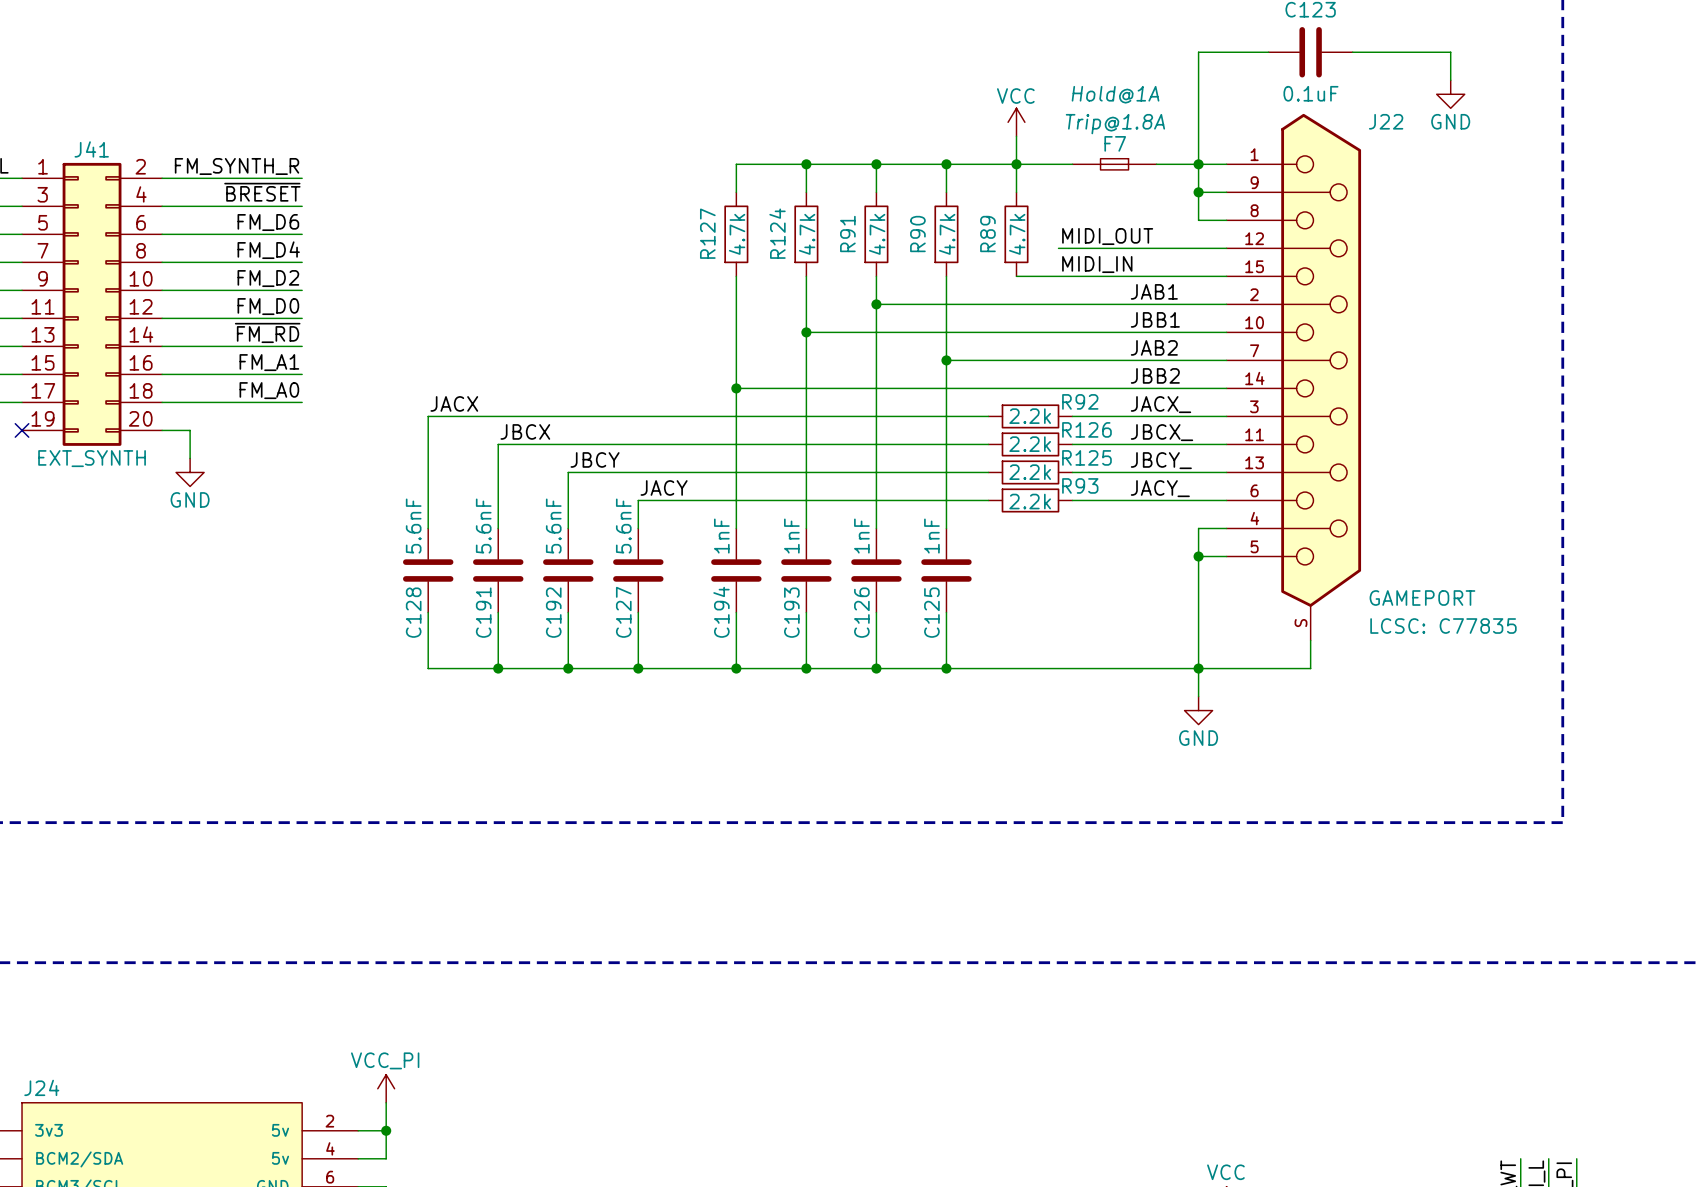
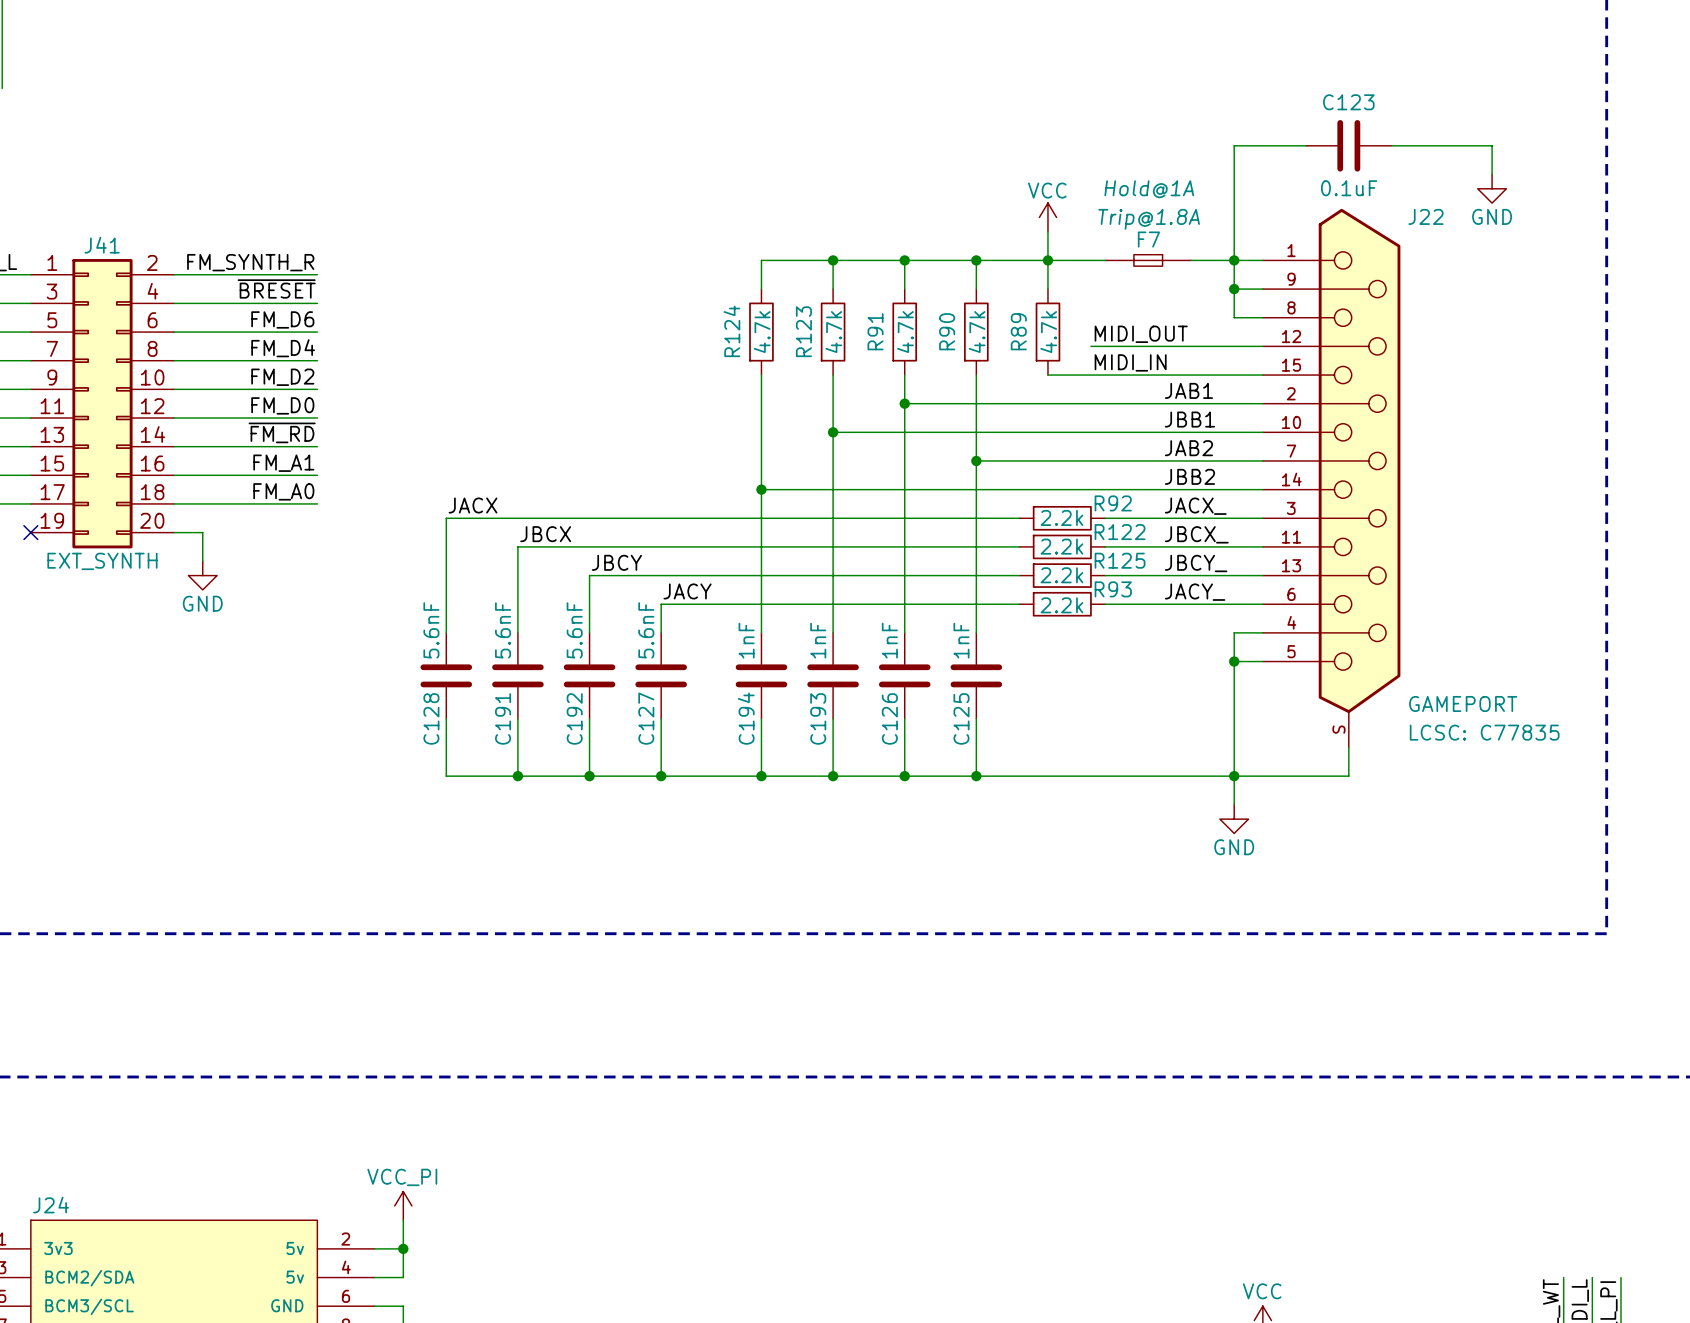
R127 name: R127 (707, 233) -> R124 (731, 331)
R124 name: R124 (777, 233) -> R123 (803, 331)
R126 name: R126 (1086, 429) -> R122 (1120, 532)

